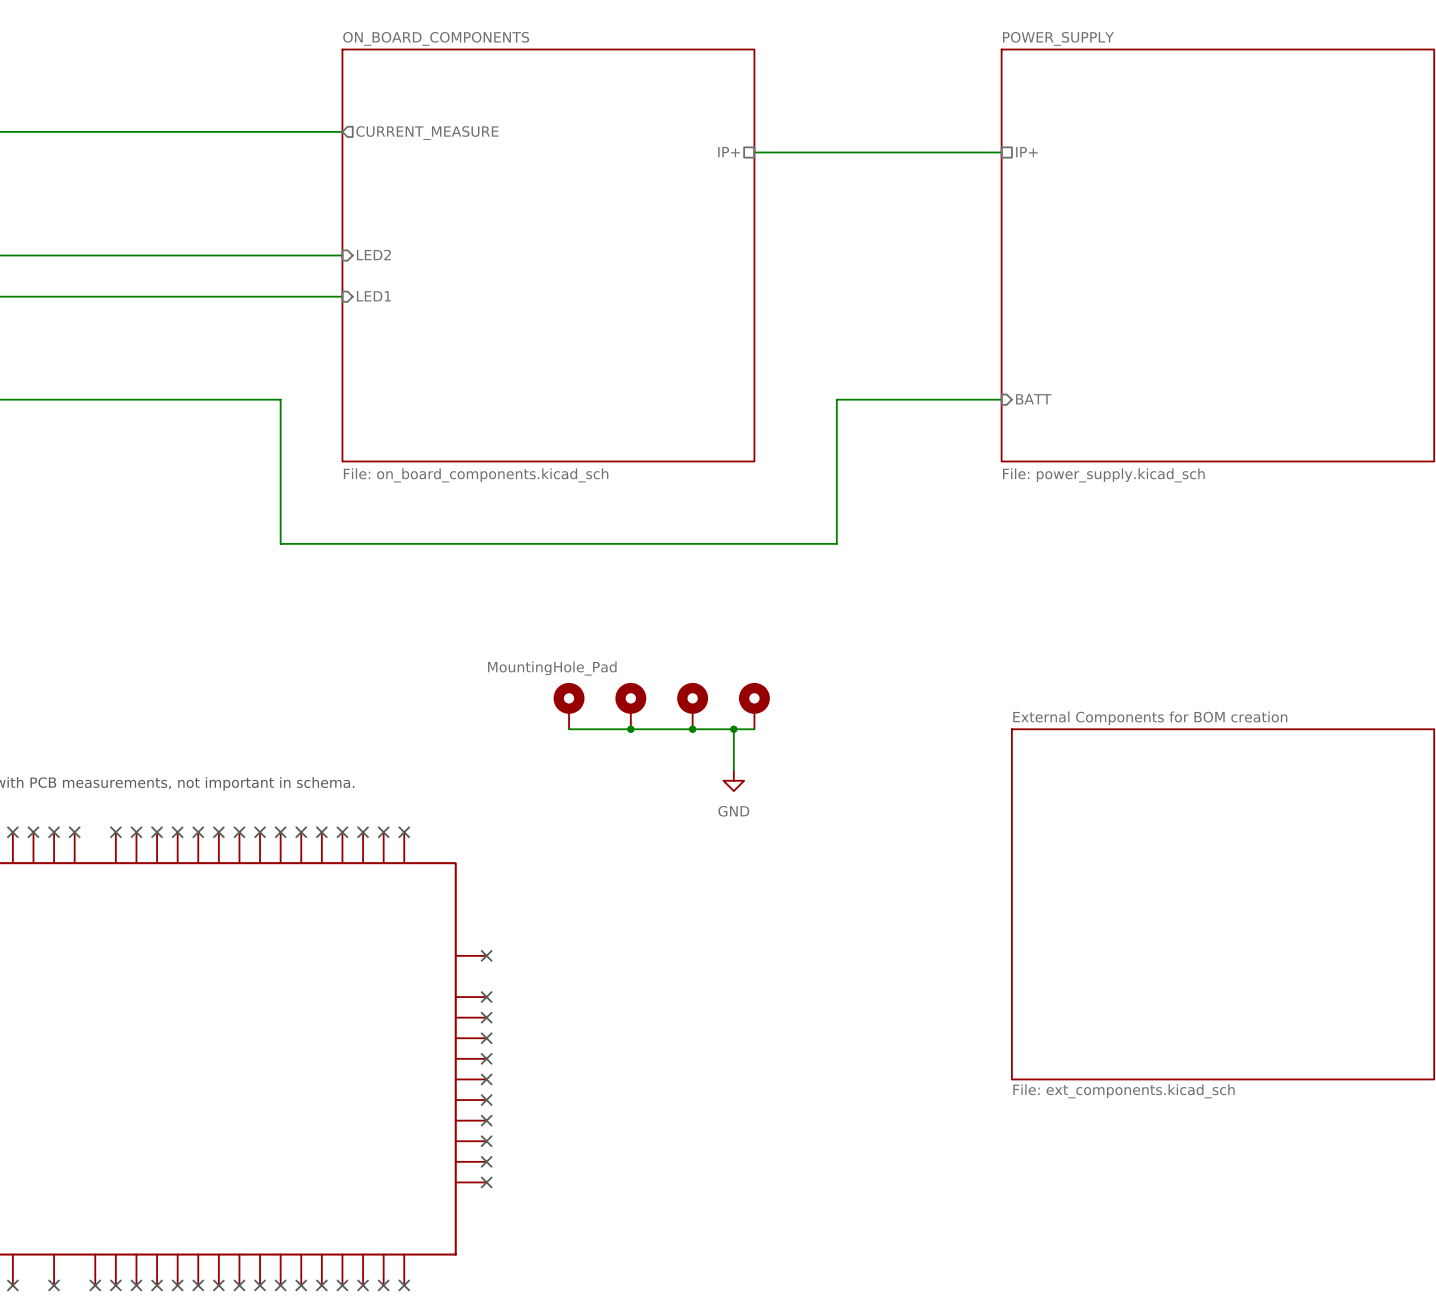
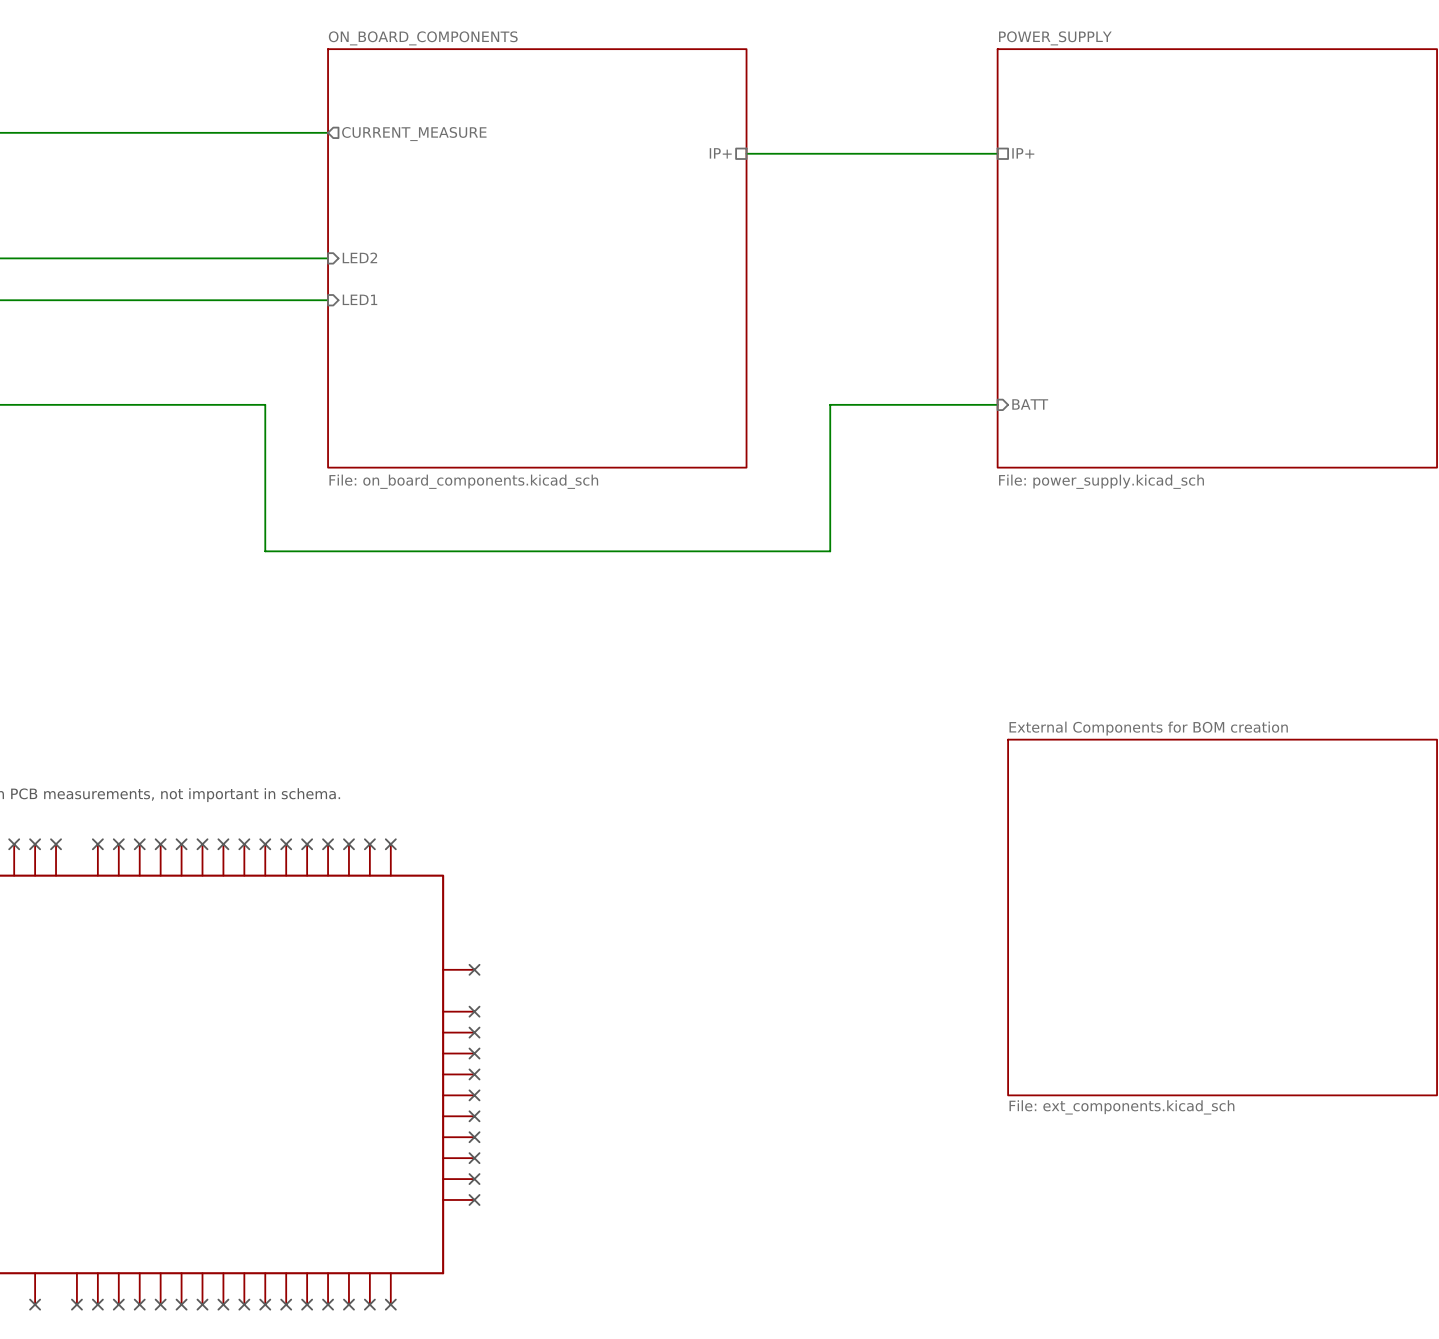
part: MountingHole_Pad (569, 706) -> none
part: (630, 706) -> none
part: (692, 706) -> none
part: (754, 706) -> none
wire: (569, 729) (754, 729) -> none
junction: (630, 729) -> none
junction: (692, 729) -> none
wire: (733, 729) (733, 770) -> none
junction: (733, 729) -> none
power symbol: GND (733, 780) -> none

